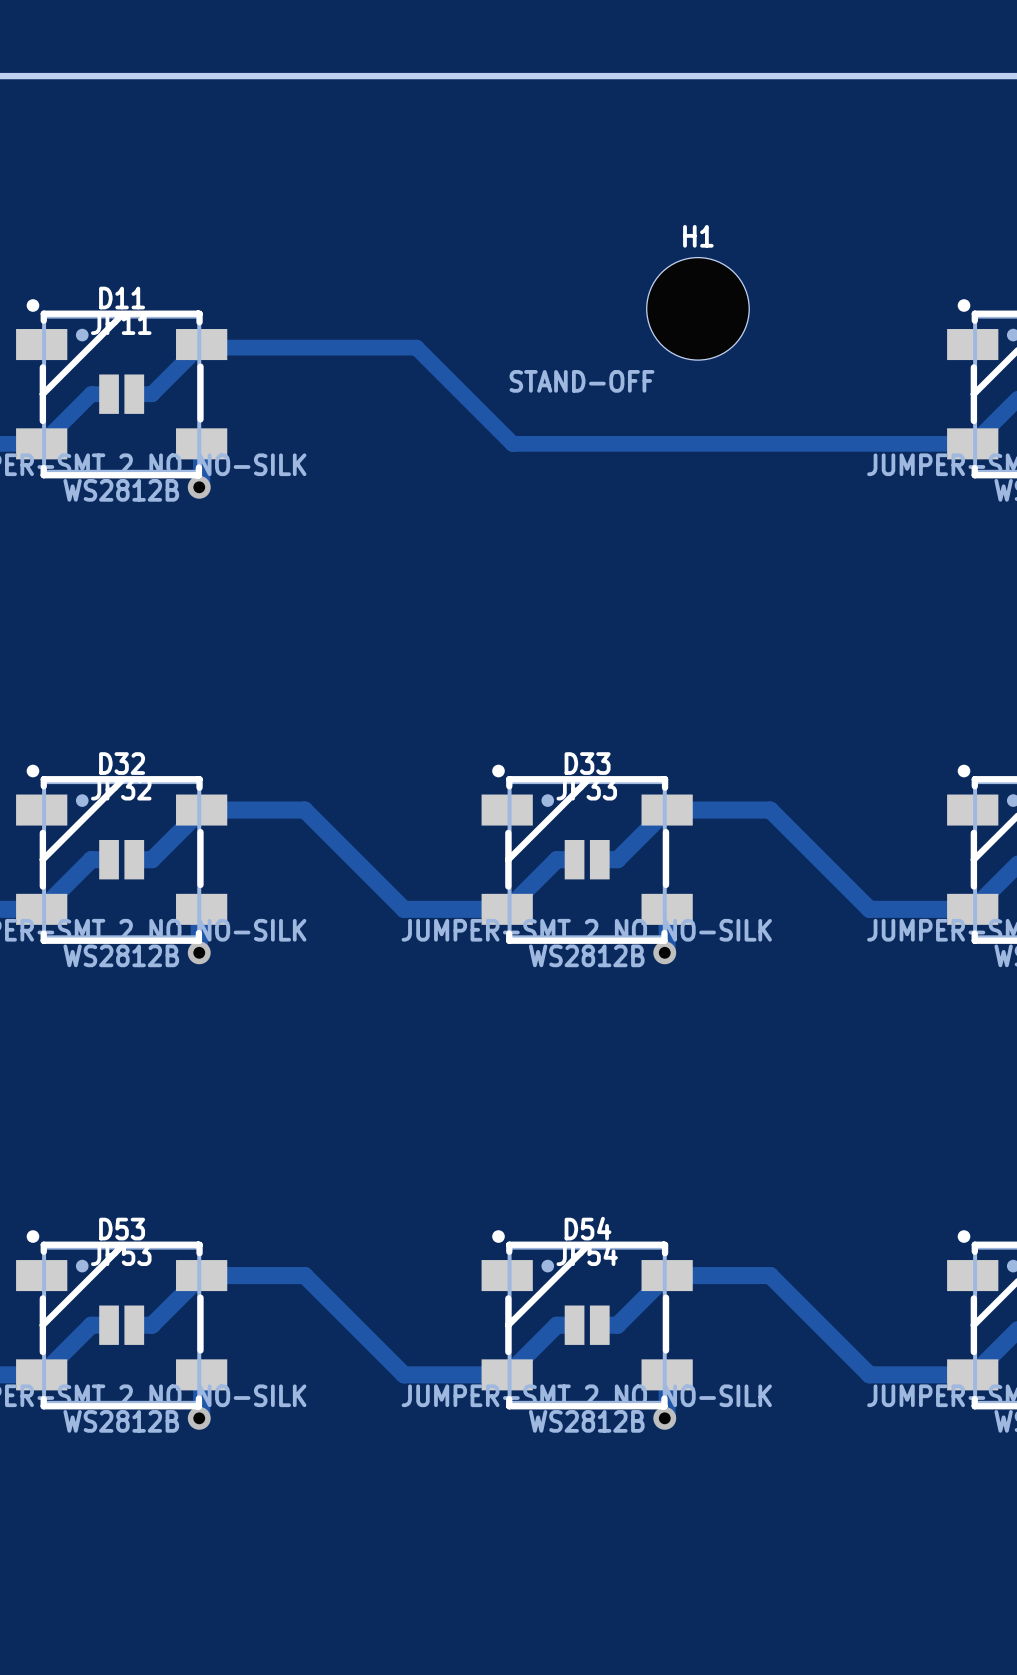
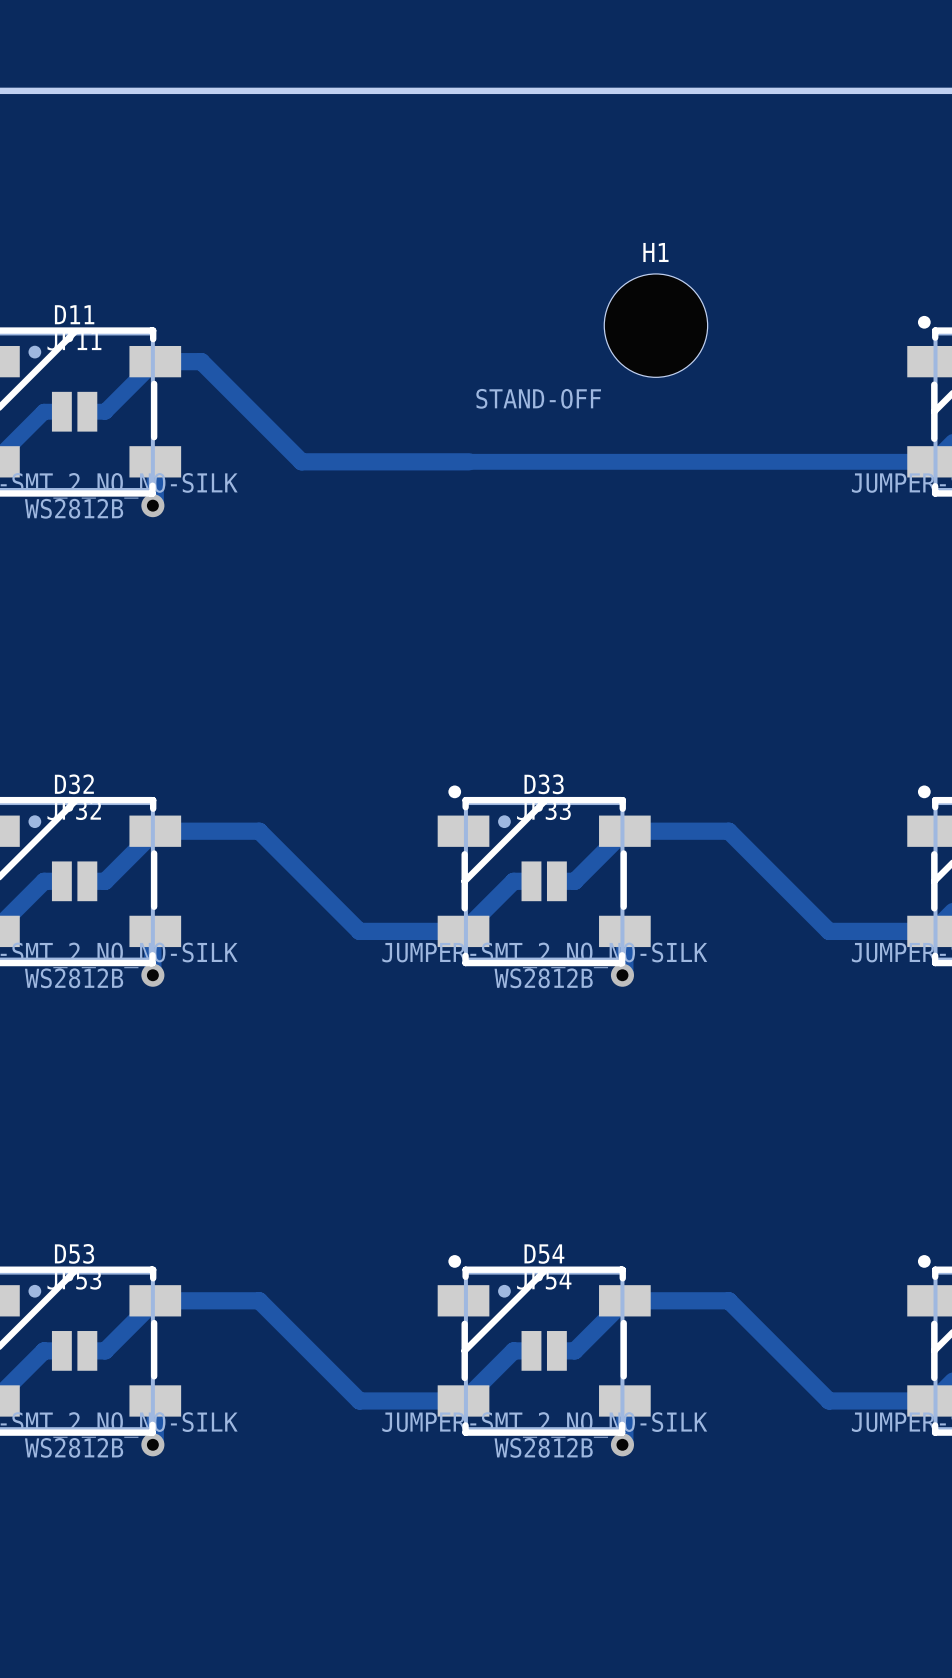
track: (201, 344) (204, 347) (416, 347) (512, 443) -> (155, 361) (201, 361) (301, 461) (469, 461)

